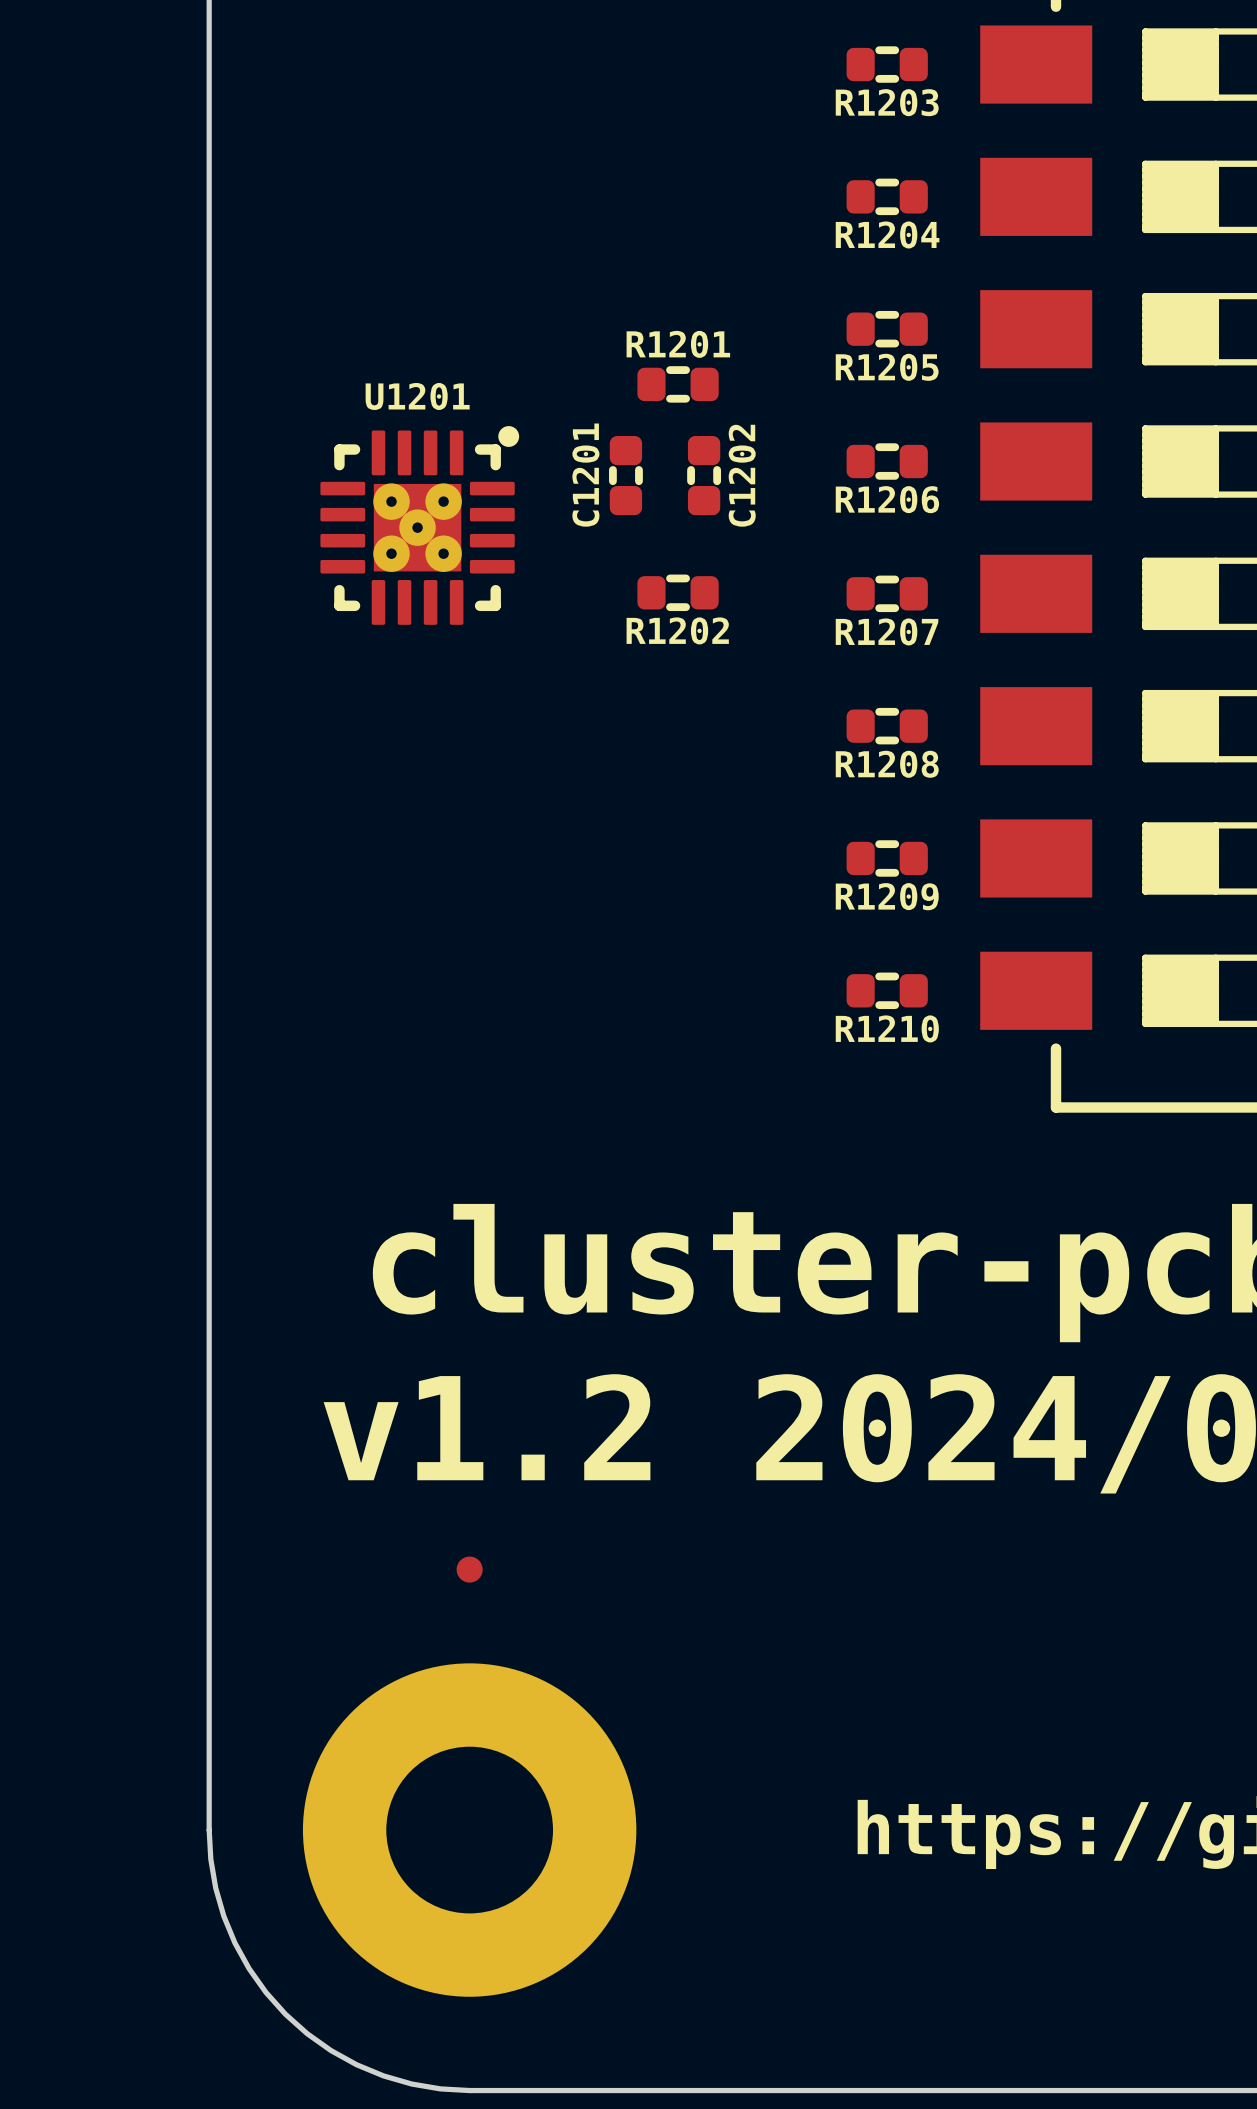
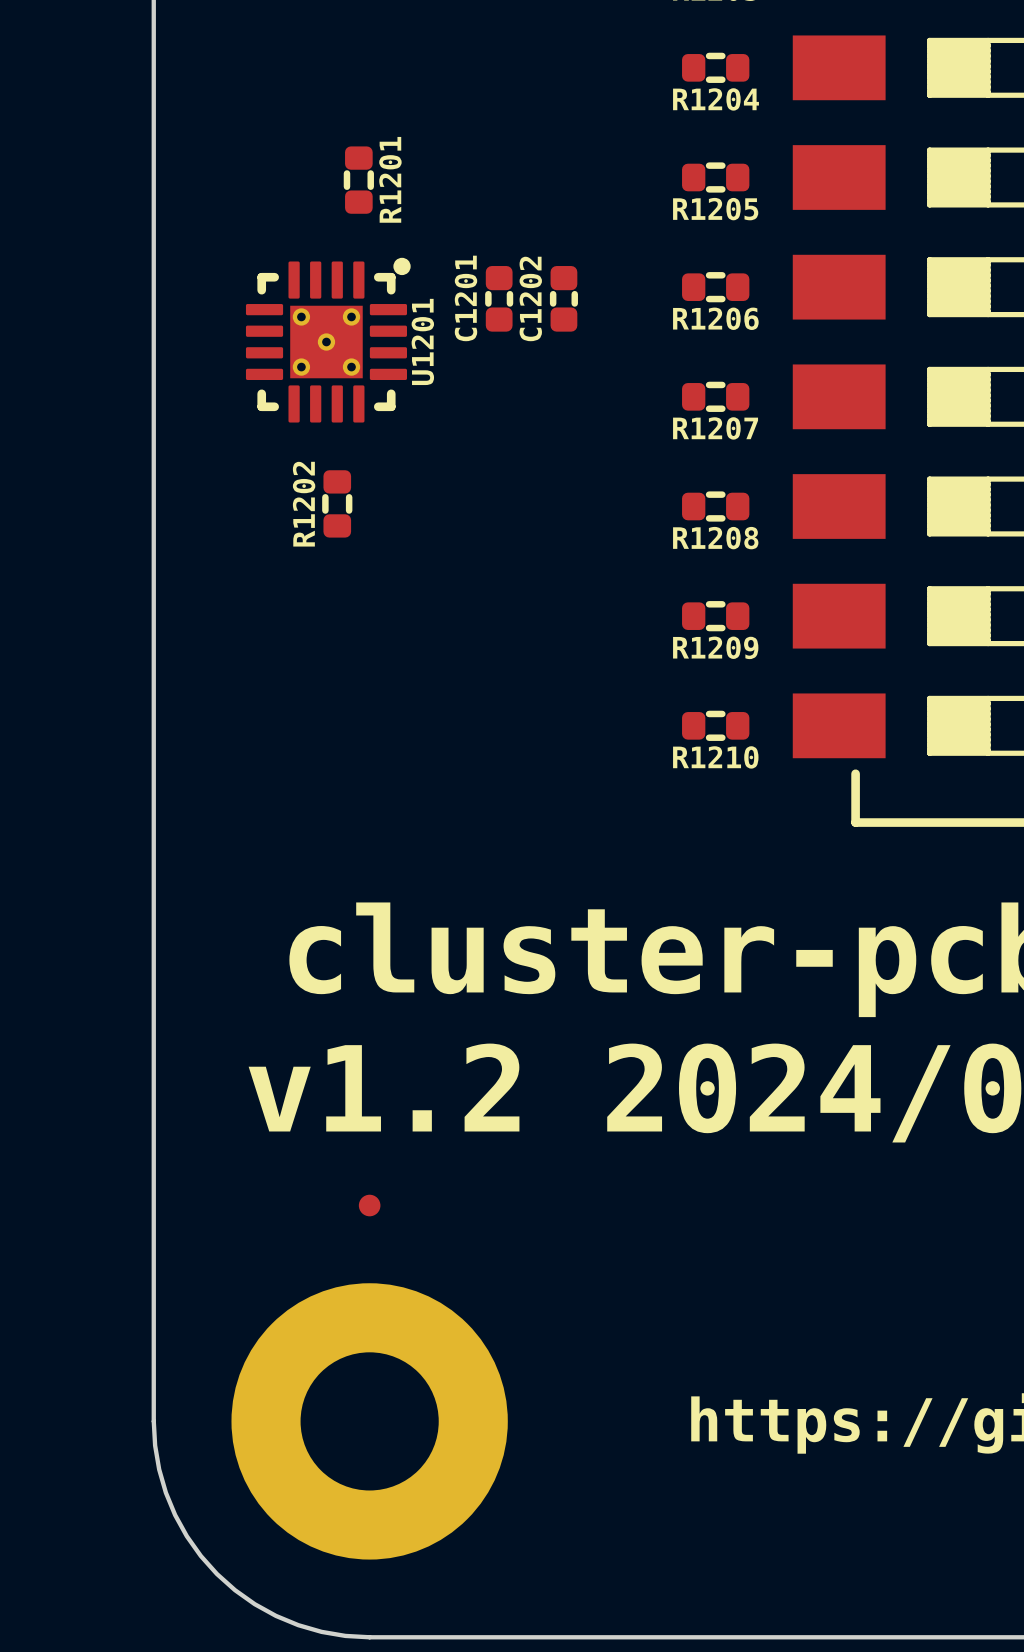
R1201 rotation: 0° (678, 384) -> 90° clockwise (358, 180)
R1201 position: (678, 384) -> (358, 180)
U1201 name rotation: 0° (417, 396) -> 90° counterclockwise (422, 341)
U1201 name position: U1201 (417, 396) -> U1201 (422, 341)
U1201 footprint: [320, 426, 520, 625] -> [245, 257, 411, 423]
C1202 name position: C1202 (742, 475) -> C1202 (530, 298)
R1202 rotation: 0° (678, 592) -> 90° clockwise (337, 503)
R1202 position: (678, 592) -> (337, 503)

